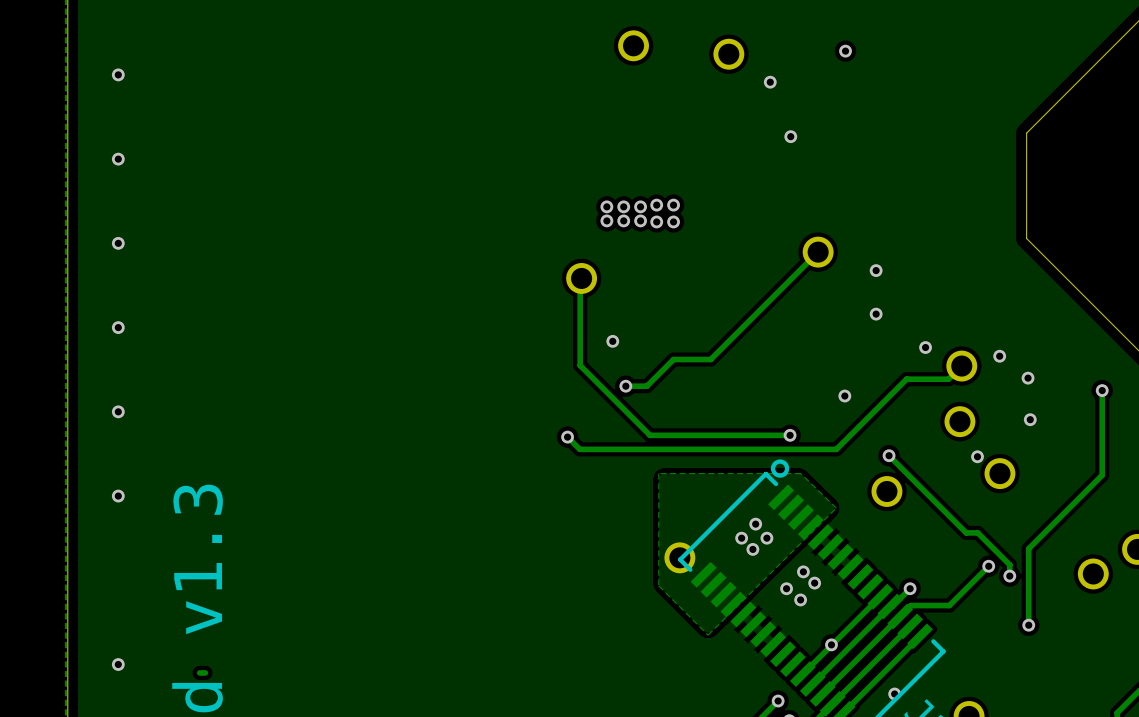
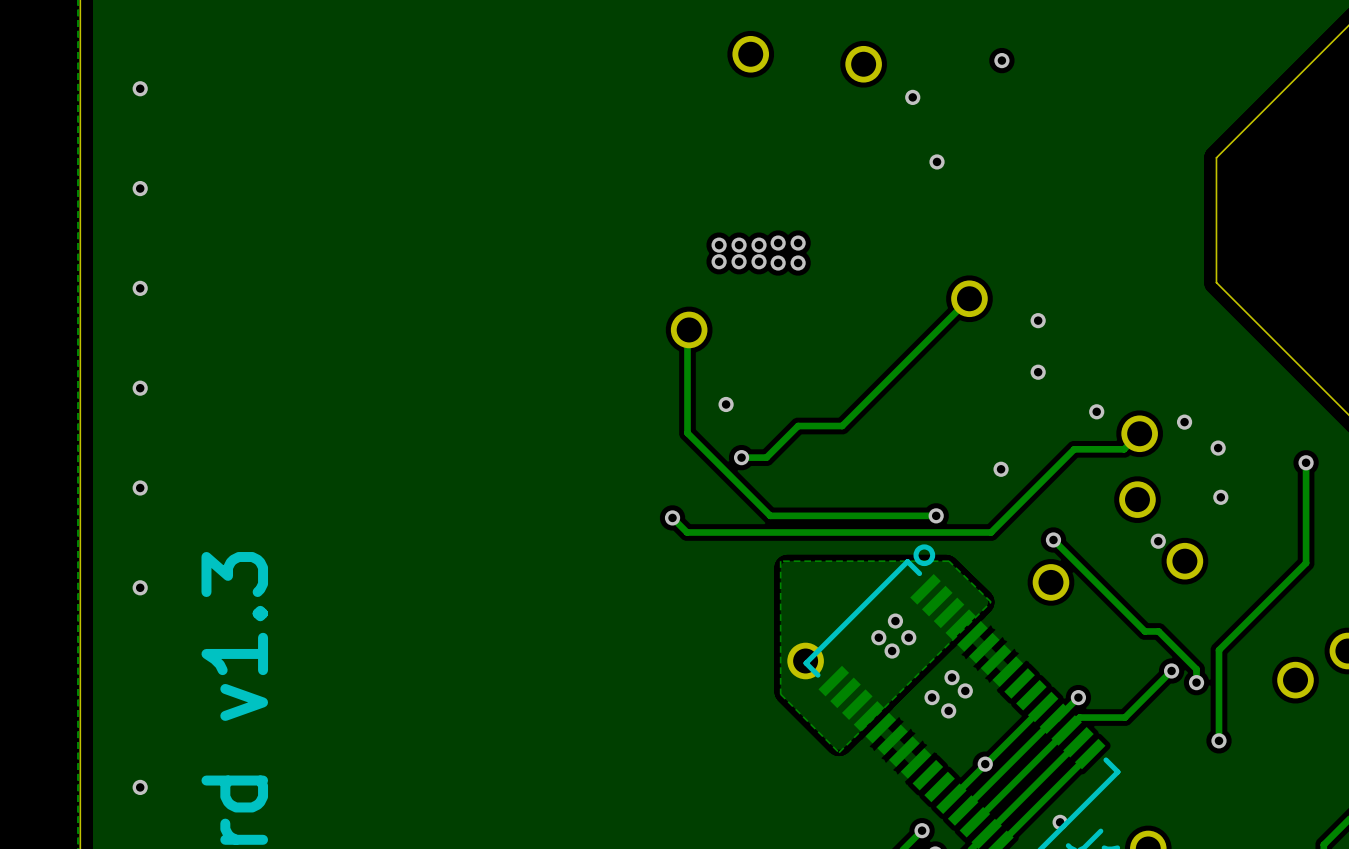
track: (205, 672) (199, 672) -> none

